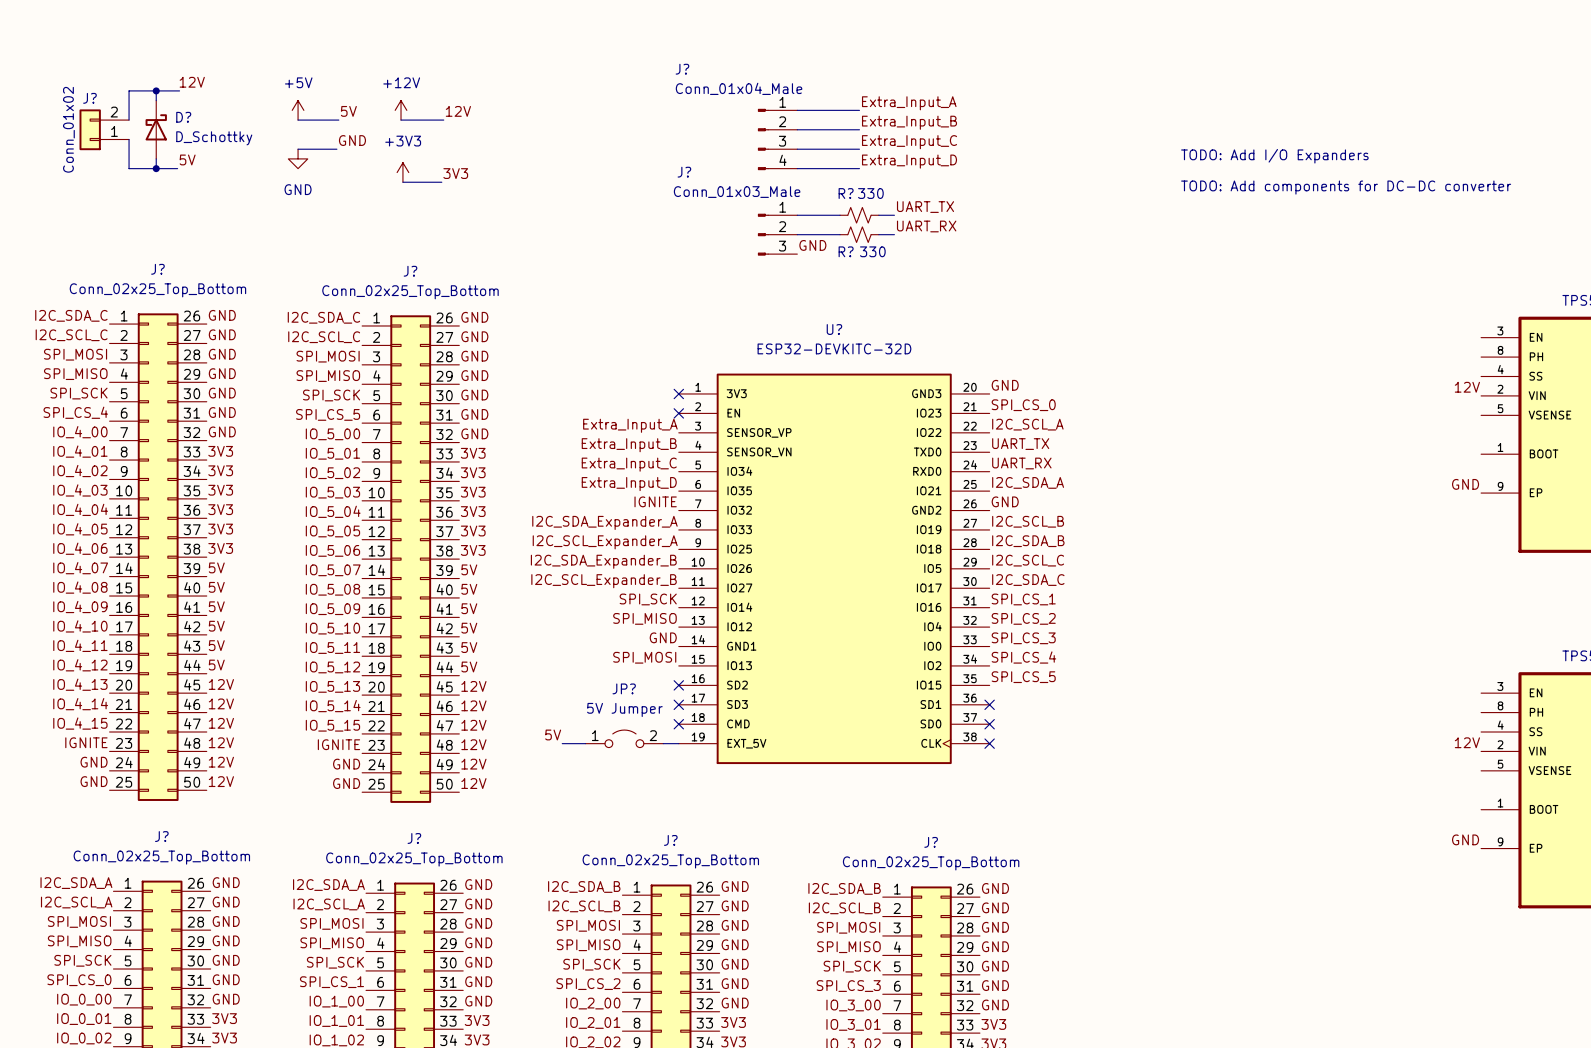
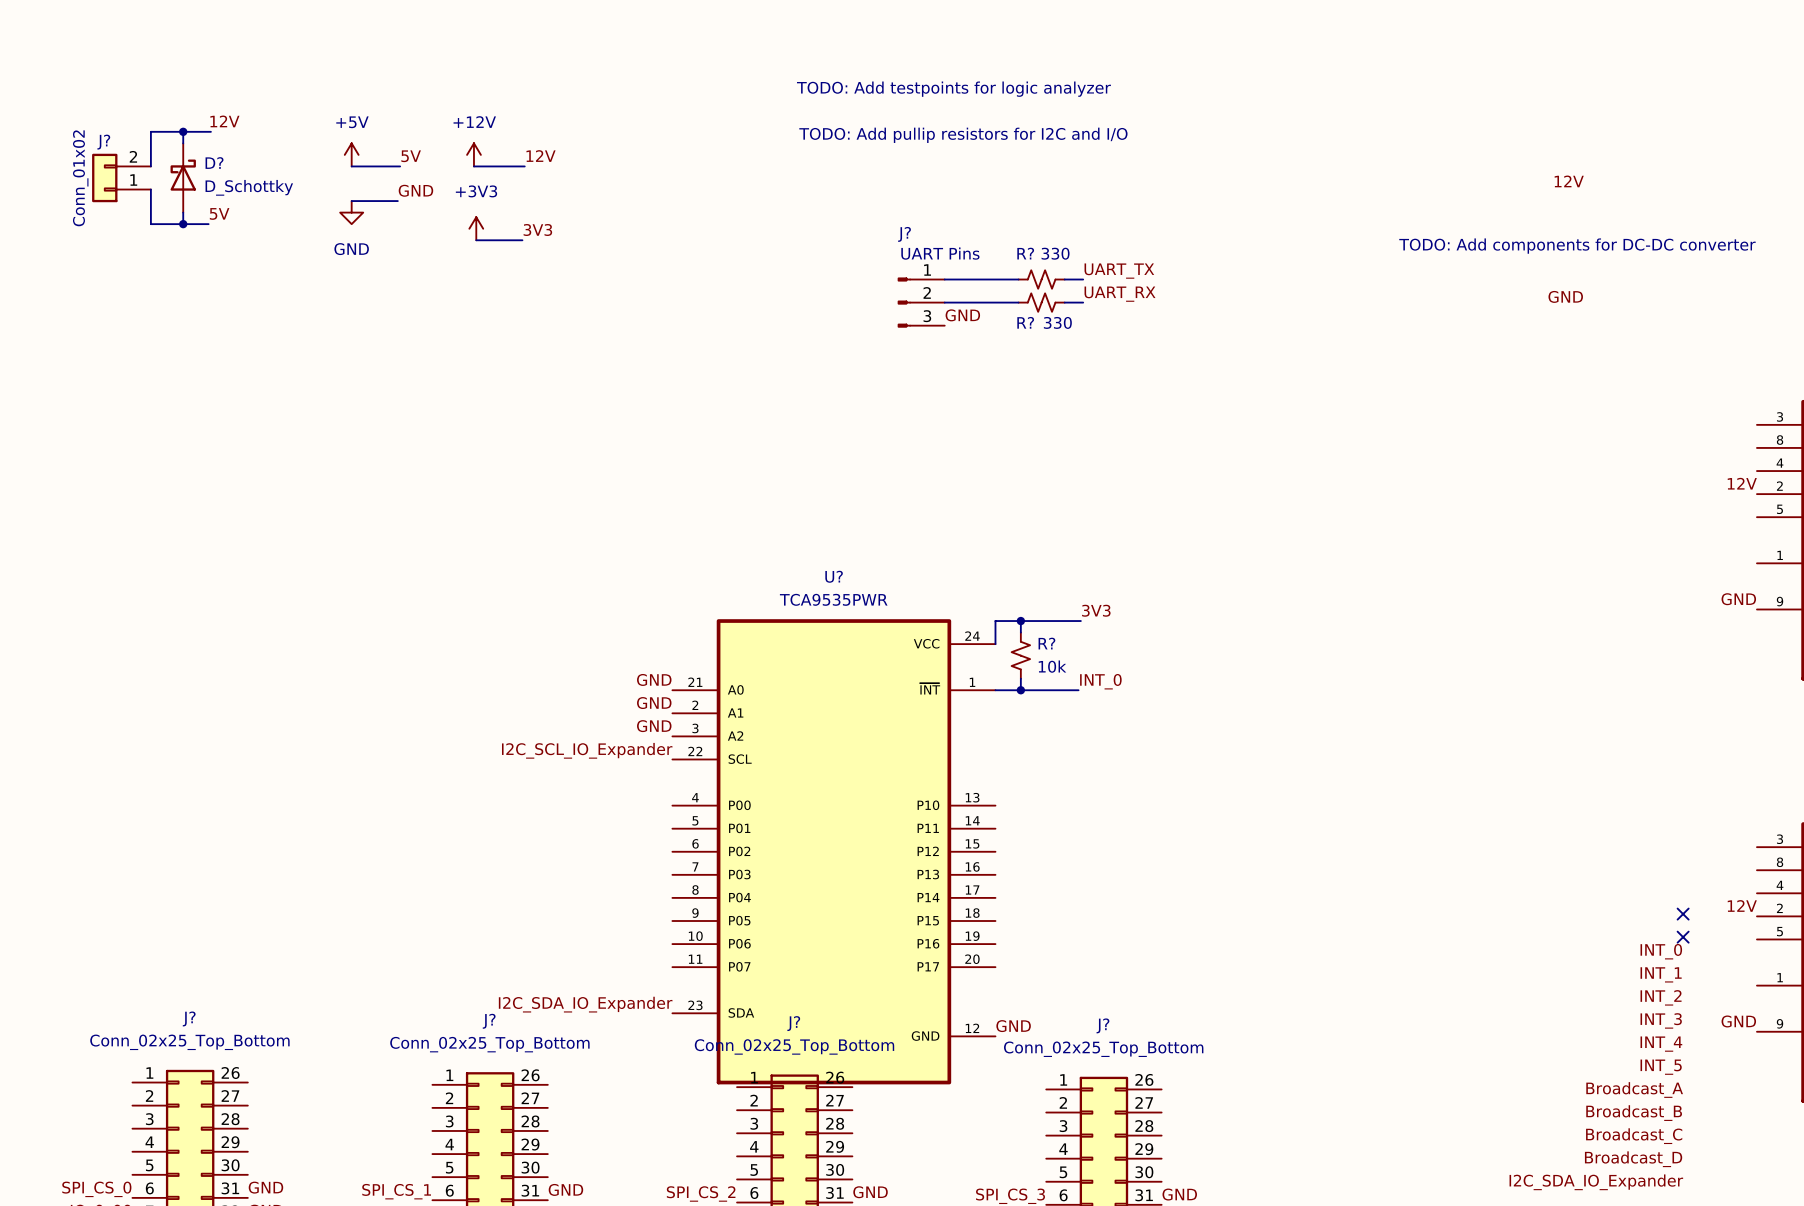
text: none -> TODO: Add testpoints for logic analyzer (953, 89)
text: none -> TODO: Add pullip resistors for I2C and I/O (963, 135)
label: Extra_Input_A (909, 103) -> none
wire: (797, 110) (859, 110) -> none
label: Extra_Input_B (909, 122) -> none
wire: (797, 129) (859, 129) -> none
label: none -> 12V (1569, 181)
J?: Conn_01x04_Male (777, 139) -> none
label: Extra_Input_C (909, 142) -> none
wire: (797, 149) (859, 149) -> none
text: TODO: Add I/O Expanders (1274, 156) -> none
label: Extra_Input_D (909, 161) -> none
wire: (797, 168) (859, 168) -> none
J? name position: J? (684, 172) -> J? (904, 234)
J? value: Conn_01x03_Male (737, 192) -> UART Pins (940, 253)
label position: UART_TX (925, 207) -> UART_TX (1119, 271)
R?: 330 (859, 215) -> none
wire: (878, 215) (894, 215) -> (1064, 279) (1083, 279)
R?: none -> 330 (1041, 279)
label position: UART_RX (926, 226) -> UART_RX (1120, 294)
label: none -> GND (1565, 296)
R?: 330 (859, 234) -> none
wire: (878, 234) (894, 234) -> (1064, 302) (1083, 302)
R?: none -> 330 (1041, 302)
label: I2C_SDA_C (71, 315) -> none
label: GND (222, 315) -> none
label: I2C_SDA_C (323, 317) -> none
label: GND (474, 317) -> none
label: GND (222, 334) -> none
label: I2C_SCL_C (71, 335) -> none
label: GND (474, 336) -> none
label: I2C_SCL_C (324, 337) -> none
label: SPI_MOSI (75, 354) -> none
label: GND (222, 354) -> none
label: SPI_MOSI (328, 356) -> none
label: GND (474, 356) -> none
label: GND (222, 373) -> none
label: SPI_MISO (75, 374) -> none
label: GND (474, 375) -> none
label: SPI_MISO (328, 376) -> none
label: GND (1005, 385) -> none
label: SPI_SCK (79, 393) -> none
label: GND (222, 393) -> none
no-connect mark: (678, 393) -> none
label: SPI_SCK (331, 395) -> none
label: GND (474, 395) -> none
label: SPI_CS_0 (1023, 405) -> none
label: SPI_CS_4 (75, 412) -> none
label: GND (222, 412) -> none
no-connect mark: (678, 413) -> none
label: SPI_CS_5 (328, 414) -> none
label: GND (474, 414) -> none
label: I2C_SCL_A (1027, 424) -> none
label: Extra_Input_A (630, 425) -> none
label: GND (222, 431) -> none
label: IO_4_00 (80, 432) -> none
label: GND (474, 433) -> none
label: IO_5_00 (332, 434) -> none
label: UART_TX (1020, 444) -> none
label: Extra_Input_B (629, 445) -> none
label: IO_4_01 (80, 451) -> none
label: 3V3 (220, 451) -> none
label: IO_5_01 (332, 453) -> none
label: 3V3 (473, 453) -> none
label: UART_RX (1021, 463) -> none
label: Extra_Input_C (629, 464) -> none
label: 3V3 (220, 470) -> none
label: IO_4_02 (80, 471) -> none
label: 3V3 (473, 472) -> none
label: IO_5_02 (332, 473) -> none
label: I2C_SDA_A (1028, 482) -> none
label: Extra_Input_D (629, 484) -> none
label: IO_4_03 (80, 490) -> none
label: 3V3 (220, 490) -> none
label: IO_5_03 (332, 492) -> none
label: 3V3 (473, 492) -> none
label: none -> 3V3 (1096, 610)
label: IGNITE (655, 501) -> none
label: GND (1005, 501) -> none
junction: none -> (1020, 621)
label: IO_4_04 (80, 509) -> none
label: 3V3 (220, 509) -> none
label: IO_5_04 (333, 511) -> none
label: 3V3 (473, 511) -> none
label: I2C_SCL_B (1028, 521) -> none
label: I2C_SDA_Expander_A (604, 522) -> none
label: IO_4_05 (80, 529) -> none
label: 3V3 (220, 529) -> none
label: IO_5_05 (332, 531) -> none
label: 3V3 (473, 531) -> none
R?: none -> 10k (1020, 655)
label: I2C_SDA_B (1028, 541) -> none
label: I2C_SCL_Expander_A (605, 542) -> none
label: IO_4_06 (80, 548) -> none
label: 3V3 (220, 548) -> none
label: IO_5_06 (332, 550) -> none
label: 3V3 (473, 550) -> none
label: none -> GND (654, 679)
label: none -> INT_0 (1100, 681)
J?: Conn_02x25_Top_Bottom (158, 557) -> none
J?: Conn_02x25_Top_Bottom (410, 559) -> none
label: I2C_SCL_C (1028, 560) -> none
label: I2C_SDA_Expander_B (603, 561) -> none
junction: none -> (1020, 690)
label: 5V (216, 567) -> none
label: IO_4_07 (80, 568) -> none
U?: ESP32-DEVKITC-32D (834, 568) -> none
label: 5V (469, 569) -> none
label: IO_5_07 (333, 570) -> none
label: none -> GND (654, 703)
label: I2C_SDA_C (1028, 580) -> none
label: I2C_SCL_Expander_B (604, 581) -> none
label: IO_4_08 (80, 587) -> none
label: 5V (216, 587) -> none
label: IO_5_08 (332, 589) -> none
label: 5V (469, 589) -> none
label: none -> GND (654, 726)
label: SPI_SCK (648, 599) -> none
label: SPI_CS_1 (1023, 599) -> none
label: 5V (216, 606) -> none
label: IO_4_09 (80, 607) -> none
label: 5V (469, 608) -> none
label: IO_5_09 (332, 609) -> none
label: none -> I2C_SCL_IO_Expander (587, 750)
label: SPI_MISO (644, 618) -> none
label: SPI_CS_2 (1023, 618) -> none
label: IO_4_10 (80, 626) -> none
label: 5V (216, 626) -> none
label: IO_5_10 (332, 628) -> none
label: 5V (469, 628) -> none
label: GND (663, 637) -> none
label: SPI_CS_3 (1023, 638) -> none
label: IO_4_11 (80, 645) -> none
label: 5V (216, 645) -> none
label: 5V (469, 647) -> none
label: IO_5_11 (332, 648) -> none
label: SPI_MOSI (644, 657) -> none
label: SPI_CS_4 (1023, 657) -> none
label: IO_4_12 (80, 665) -> none
label: 5V (216, 665) -> none
label: 5V (469, 666) -> none
label: IO_5_12 (332, 667) -> none
label: SPI_CS_5 (1023, 677) -> none
label: IO_4_13 (80, 684) -> none
label: 12V (221, 684) -> none
no-connect mark: (678, 685) -> none
label: IO_5_13 (332, 686) -> none
label: 12V (473, 686) -> none
U?: none -> TCA9535PWR (833, 851)
label: 12V (221, 703) -> none
label: IO_4_14 (80, 704) -> none
no-connect mark: (678, 704) -> none
no-connect mark: (989, 704) -> none
label: 12V (473, 705) -> none
label: IO_5_14 (333, 706) -> none
label: IO_4_15 (80, 723) -> none
label: 12V (221, 723) -> none
no-connect mark: (678, 724) -> none
no-connect mark: (989, 724) -> none
label: IO_5_15 (332, 725) -> none
label: 12V (473, 725) -> none
label: 5V (553, 734) -> none
JP?: 5V Jumper (624, 738) -> none
label: IGNITE (86, 742) -> none
label: 12V (221, 742) -> none
wire: (562, 743) (585, 743) -> none
no-connect mark: (989, 743) -> none
label: IGNITE (338, 744) -> none
label: 12V (473, 744) -> none
no-connect mark: none -> (1683, 914)
label: GND (94, 762) -> none
label: 12V (221, 762) -> none
label: GND (346, 764) -> none
label: 12V (473, 764) -> none
no-connect mark: none -> (1683, 937)
label: none -> INT_0 (1661, 951)
label: GND (94, 781) -> none
label: 12V (221, 781) -> none
label: GND (346, 783) -> none
label: 12V (473, 783) -> none
label: none -> INT_1 (1661, 974)
label: none -> INT_2 (1661, 997)
label: none -> I2C_SDA_IO_Expander (585, 1004)
label: none -> INT_3 (1661, 1020)
label: none -> GND (1013, 1026)
label: none -> INT_4 (1661, 1044)
label: none -> INT_5 (1661, 1067)
label: GND (226, 882) -> none
label: I2C_SDA_A (76, 883) -> none
label: GND (478, 884) -> none
label: I2C_SDA_A (328, 885) -> none
label: I2C_SDA_B (584, 886) -> none
label: GND (735, 886) -> none
label: I2C_SDA_B (844, 888) -> none
label: GND (995, 888) -> none
label: none -> Broadcast_A (1634, 1090)
label: I2C_SCL_A (76, 902) -> none
label: GND (226, 902) -> none
label: I2C_SCL_A (329, 904) -> none
label: GND (478, 904) -> none
label: GND (735, 905) -> none
label: I2C_SCL_B (584, 906) -> none
label: GND (995, 907) -> none
label: I2C_SCL_B (844, 908) -> none
label: none -> Broadcast_B (1634, 1113)
label: SPI_MOSI (79, 921) -> none
label: GND (226, 921) -> none
label: SPI_MOSI (331, 923) -> none
label: GND (478, 923) -> none
label: SPI_MOSI (588, 925) -> none
label: GND (735, 925) -> none
label: SPI_MOSI (848, 927) -> none
label: GND (995, 927) -> none
label: none -> Broadcast_C (1634, 1136)
label: GND (226, 940) -> none
label: SPI_MISO (79, 941) -> none
label: GND (478, 942) -> none
label: SPI_MISO (332, 943) -> none
label: GND (735, 944) -> none
label: SPI_MISO (588, 945) -> none
label: GND (995, 946) -> none
label: SPI_MISO (848, 947) -> none
label: none -> Broadcast_D (1633, 1159)
label: SPI_SCK (82, 960) -> none
label: GND (226, 960) -> none
label: SPI_SCK (335, 962) -> none
label: GND (478, 962) -> none
label: SPI_SCK (591, 964) -> none
label: GND (735, 964) -> none
label: SPI_SCK (852, 966) -> none
label: GND (995, 966) -> none
label: none -> I2C_SDA_IO_Expander (1596, 1182)

